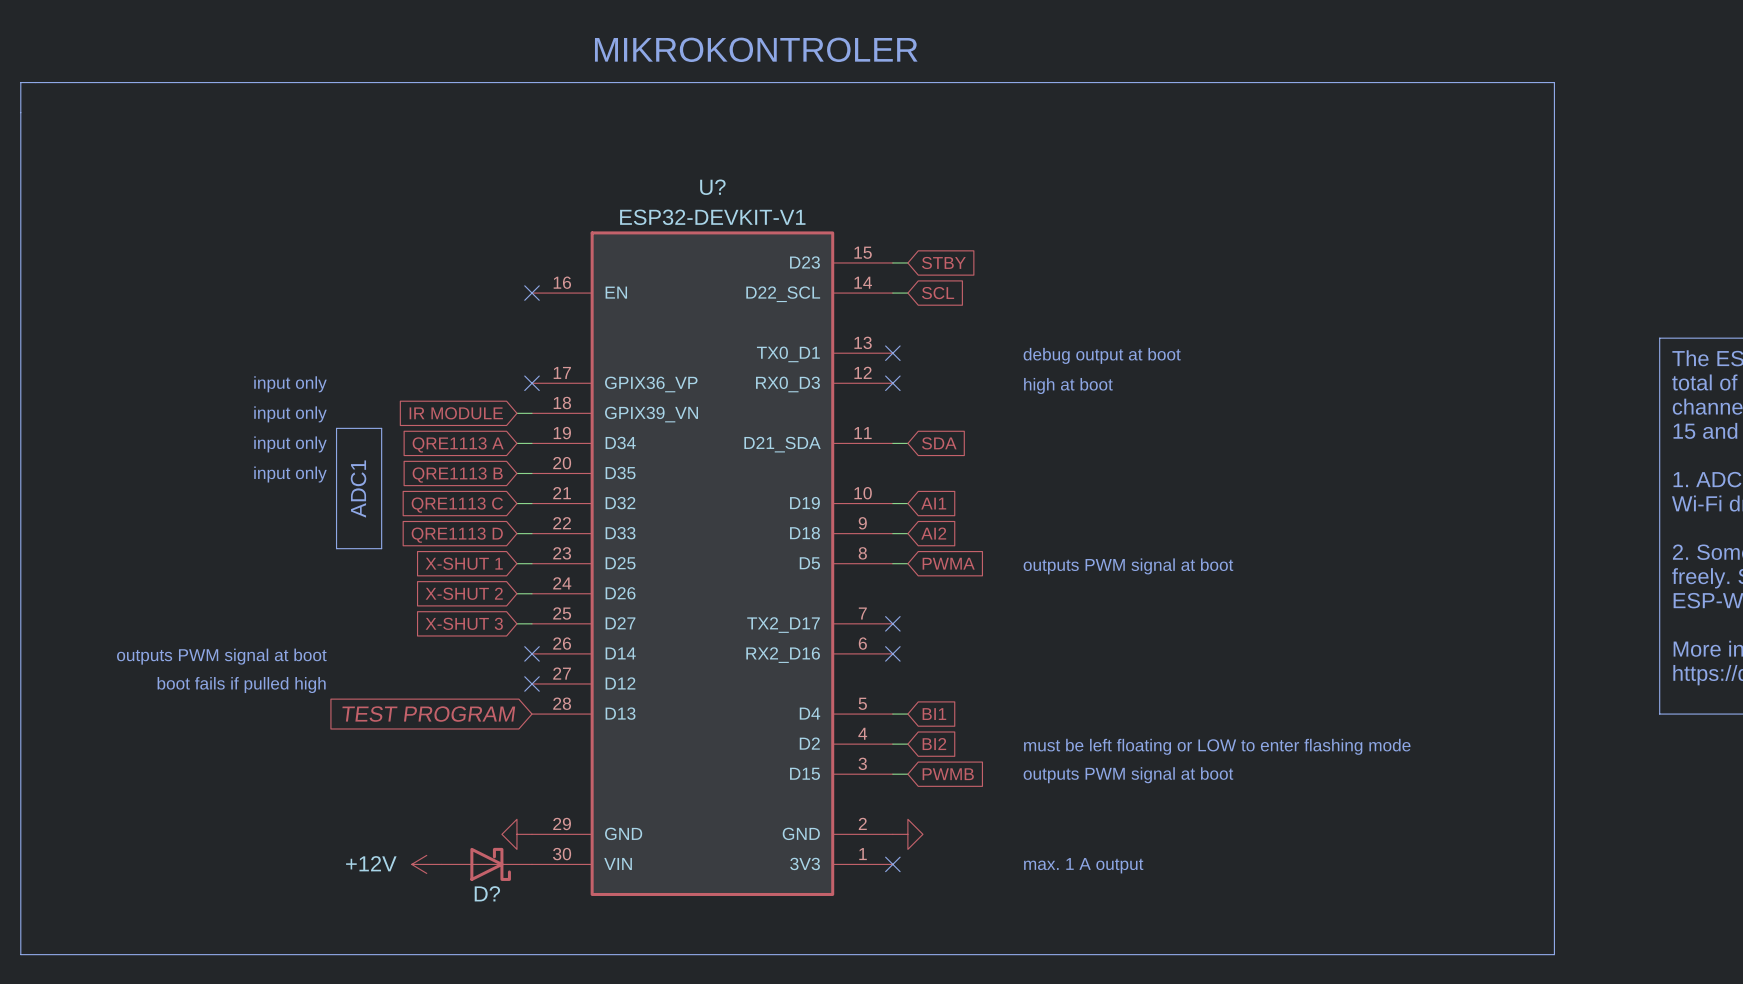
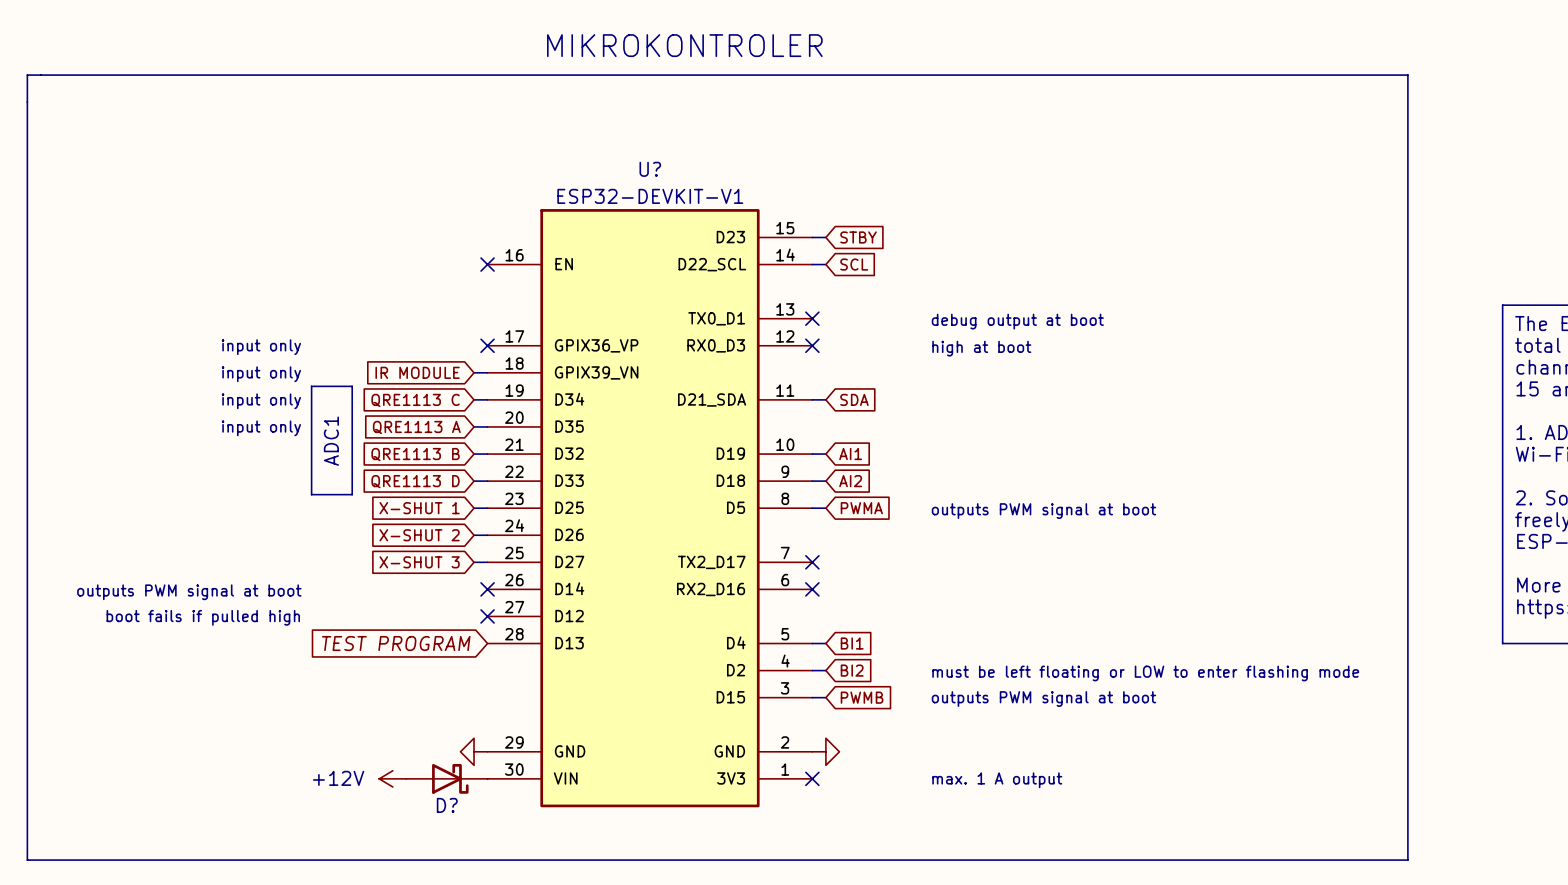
global label: QRE1113 A (458, 444) -> QRE1113 C (415, 400)
global label: QRE1113 B (457, 475) -> QRE1113 A (416, 427)
global label: QRE1113 C (457, 505) -> QRE1113 B (415, 454)

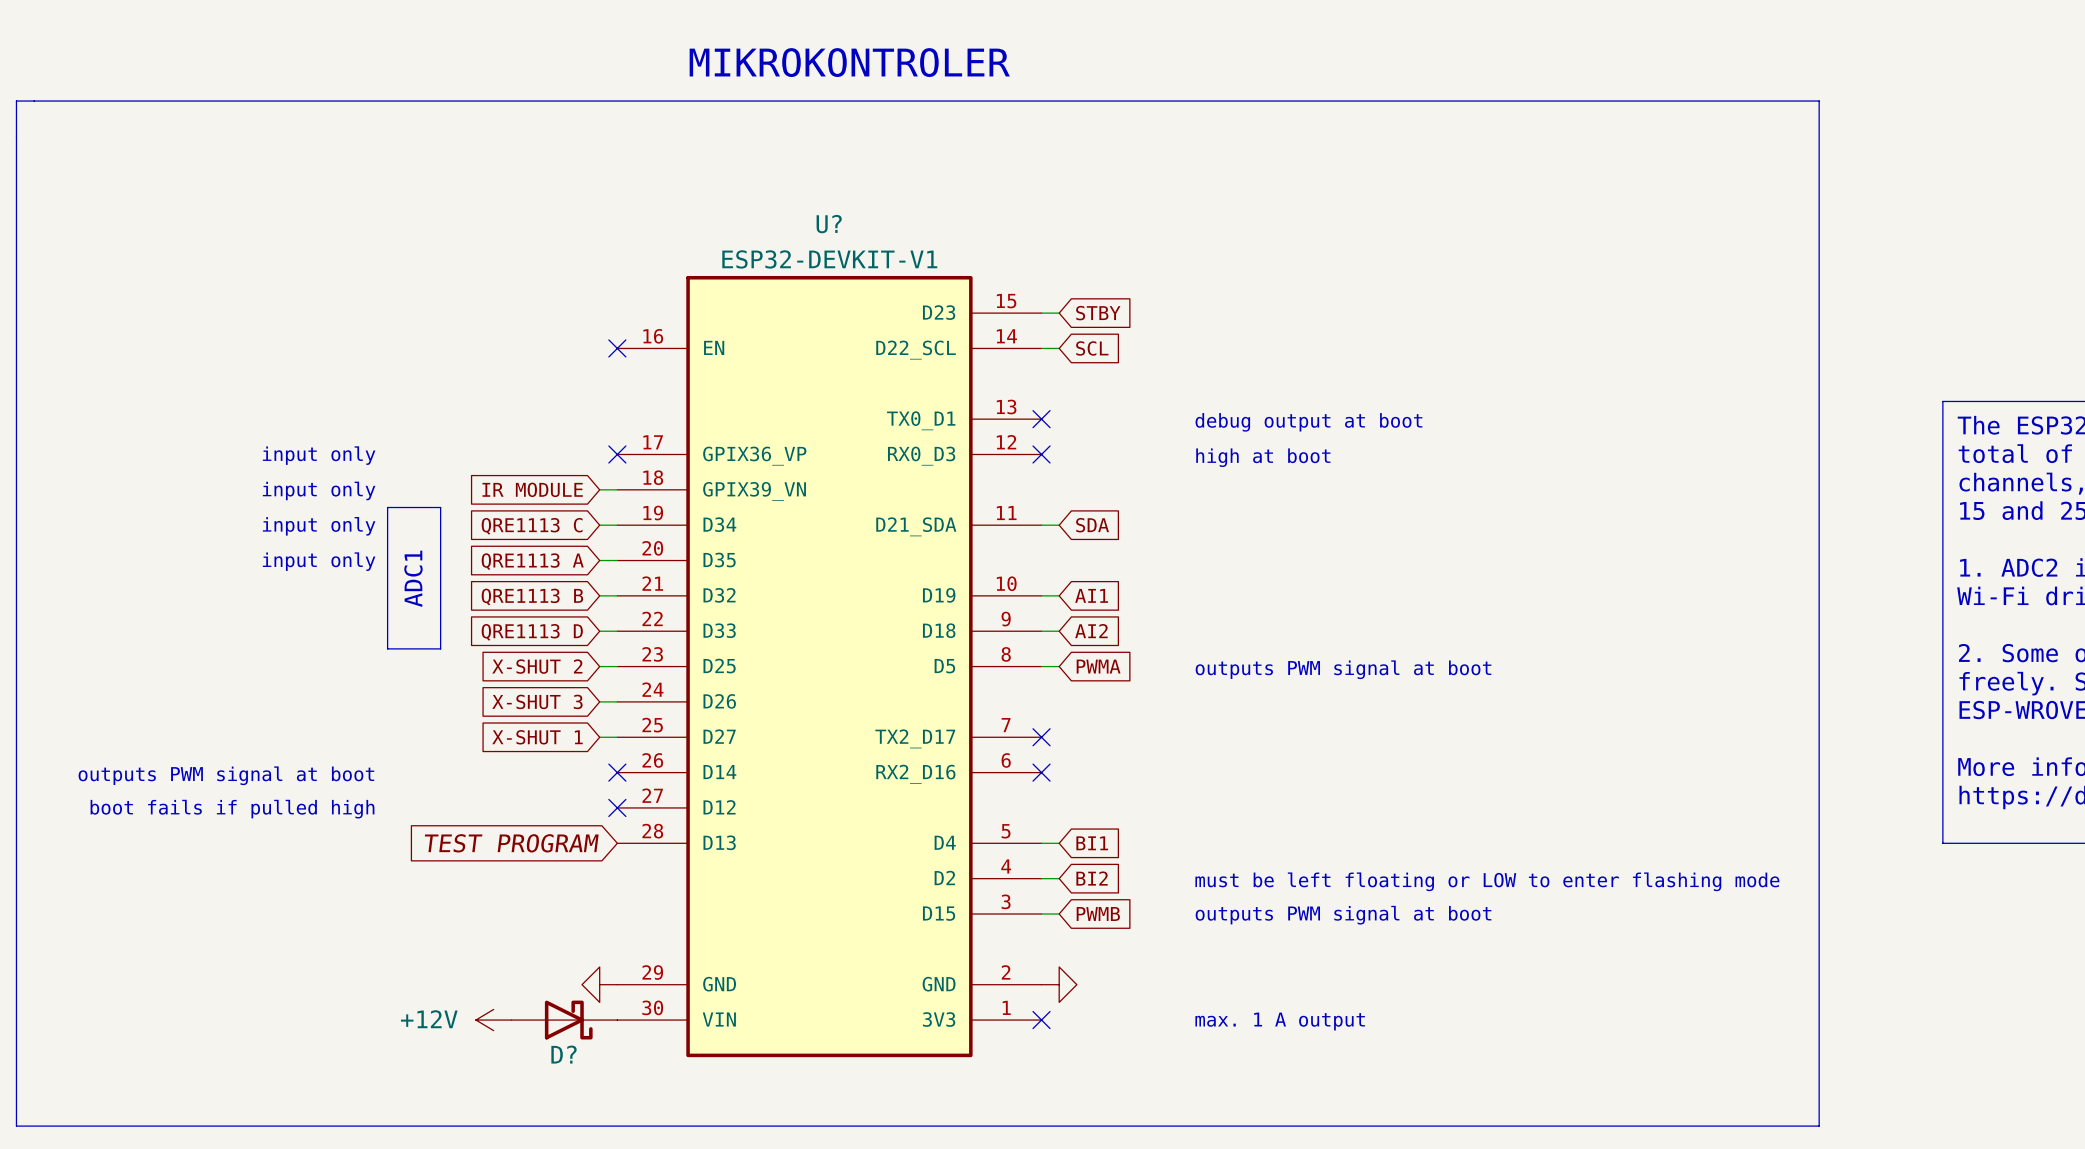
global label: X-SHUT 1 (419, 508) -> X-SHUT 2 (537, 666)
global label: X-SHUT 2 (419, 535) -> X-SHUT 3 (537, 701)
global label: X-SHUT 3 (419, 562) -> X-SHUT 1 (537, 737)

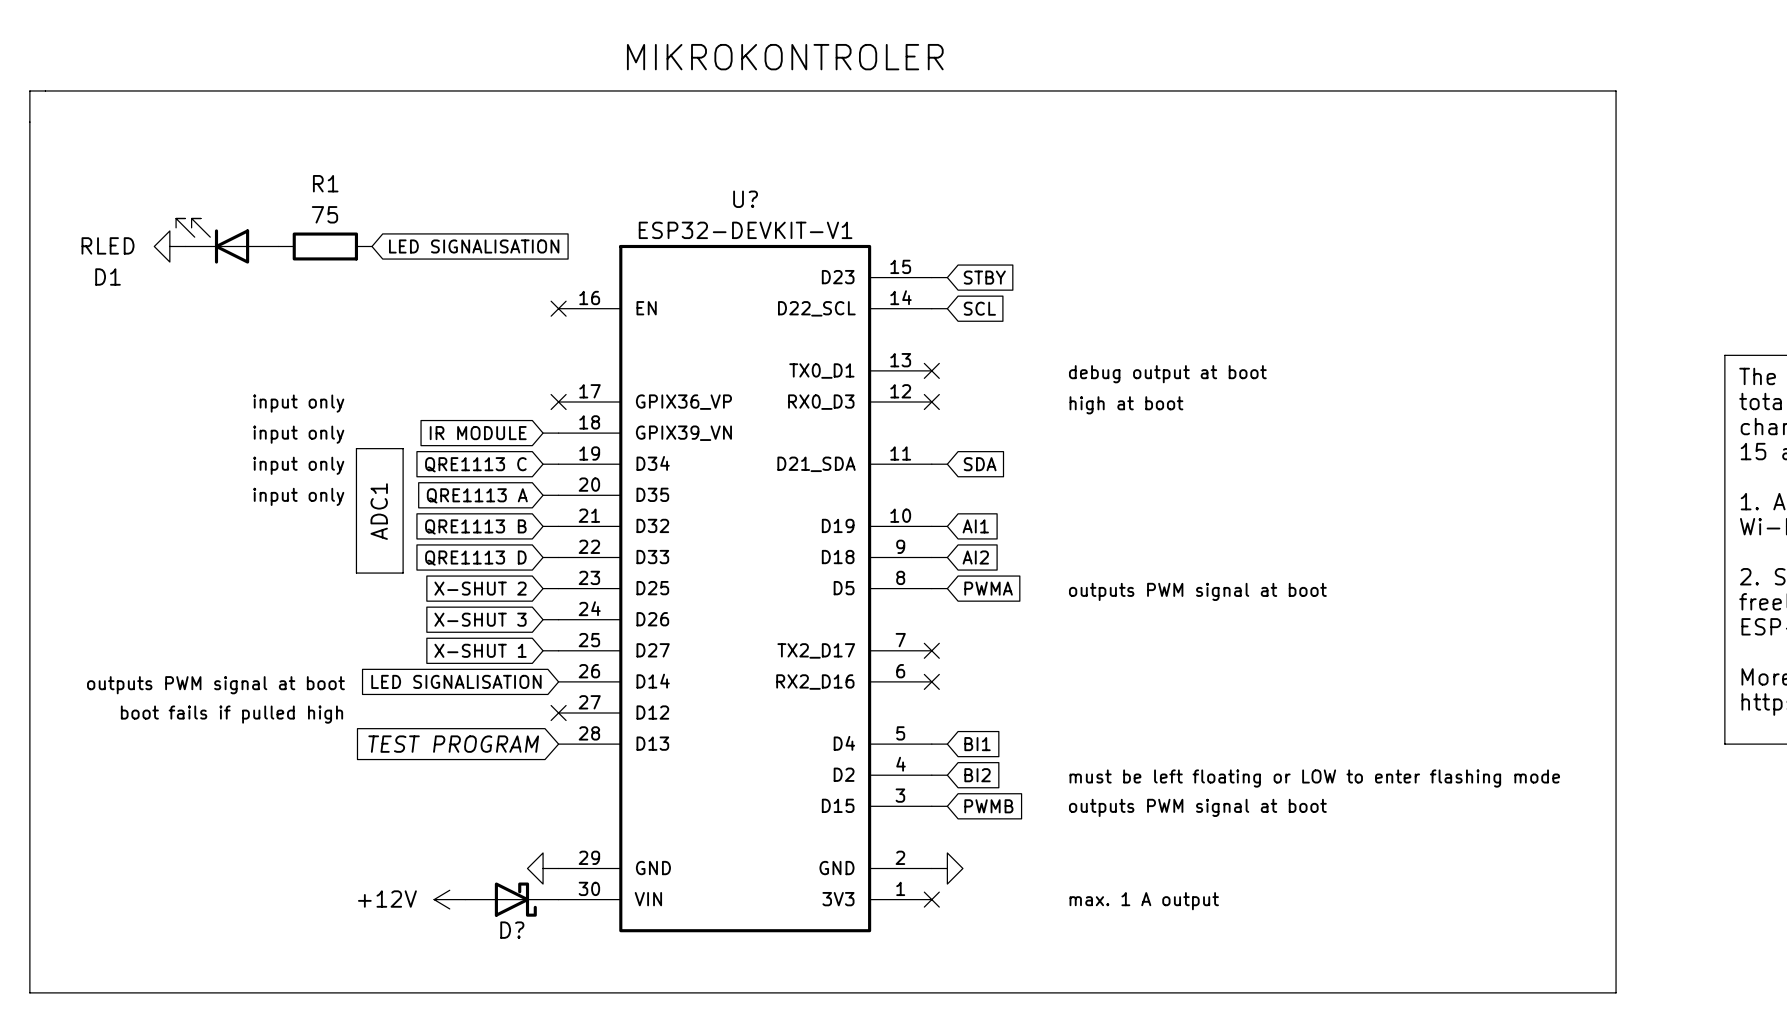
D1: none -> RLED (227, 241)
power symbol: none -> (169, 246)
R1: none -> 75 (325, 246)
global label: none -> LED SIGNALISATION (474, 246)
global label: none -> LED SIGNALISATION (456, 681)
no-connect mark: (617, 772) -> none

